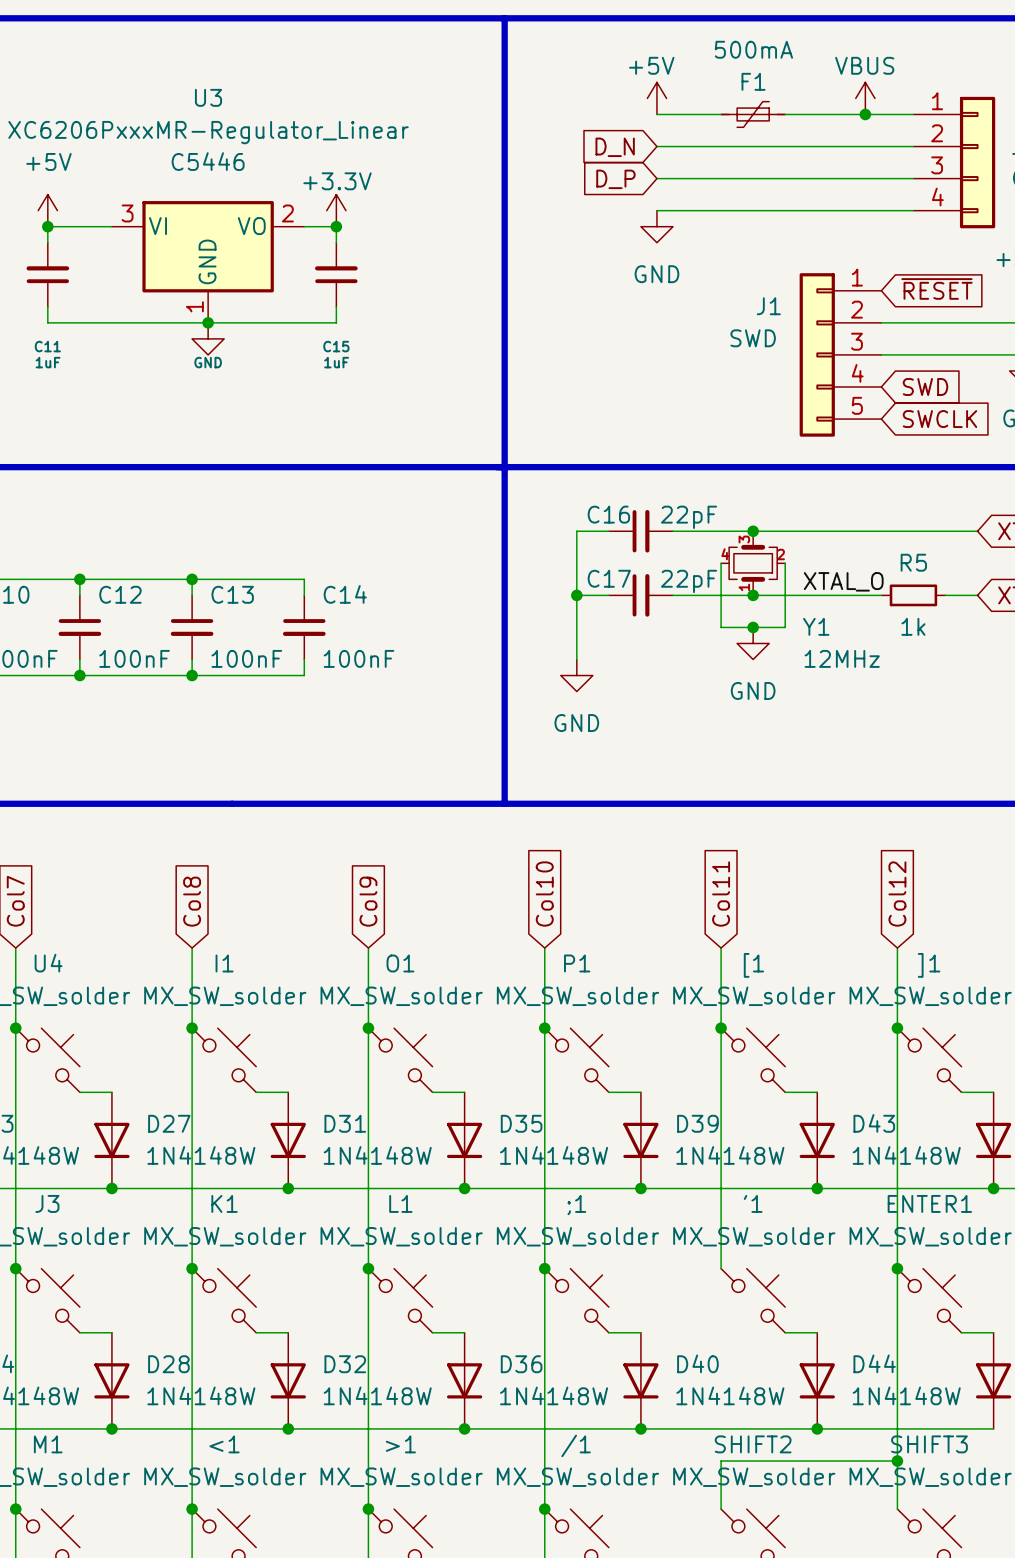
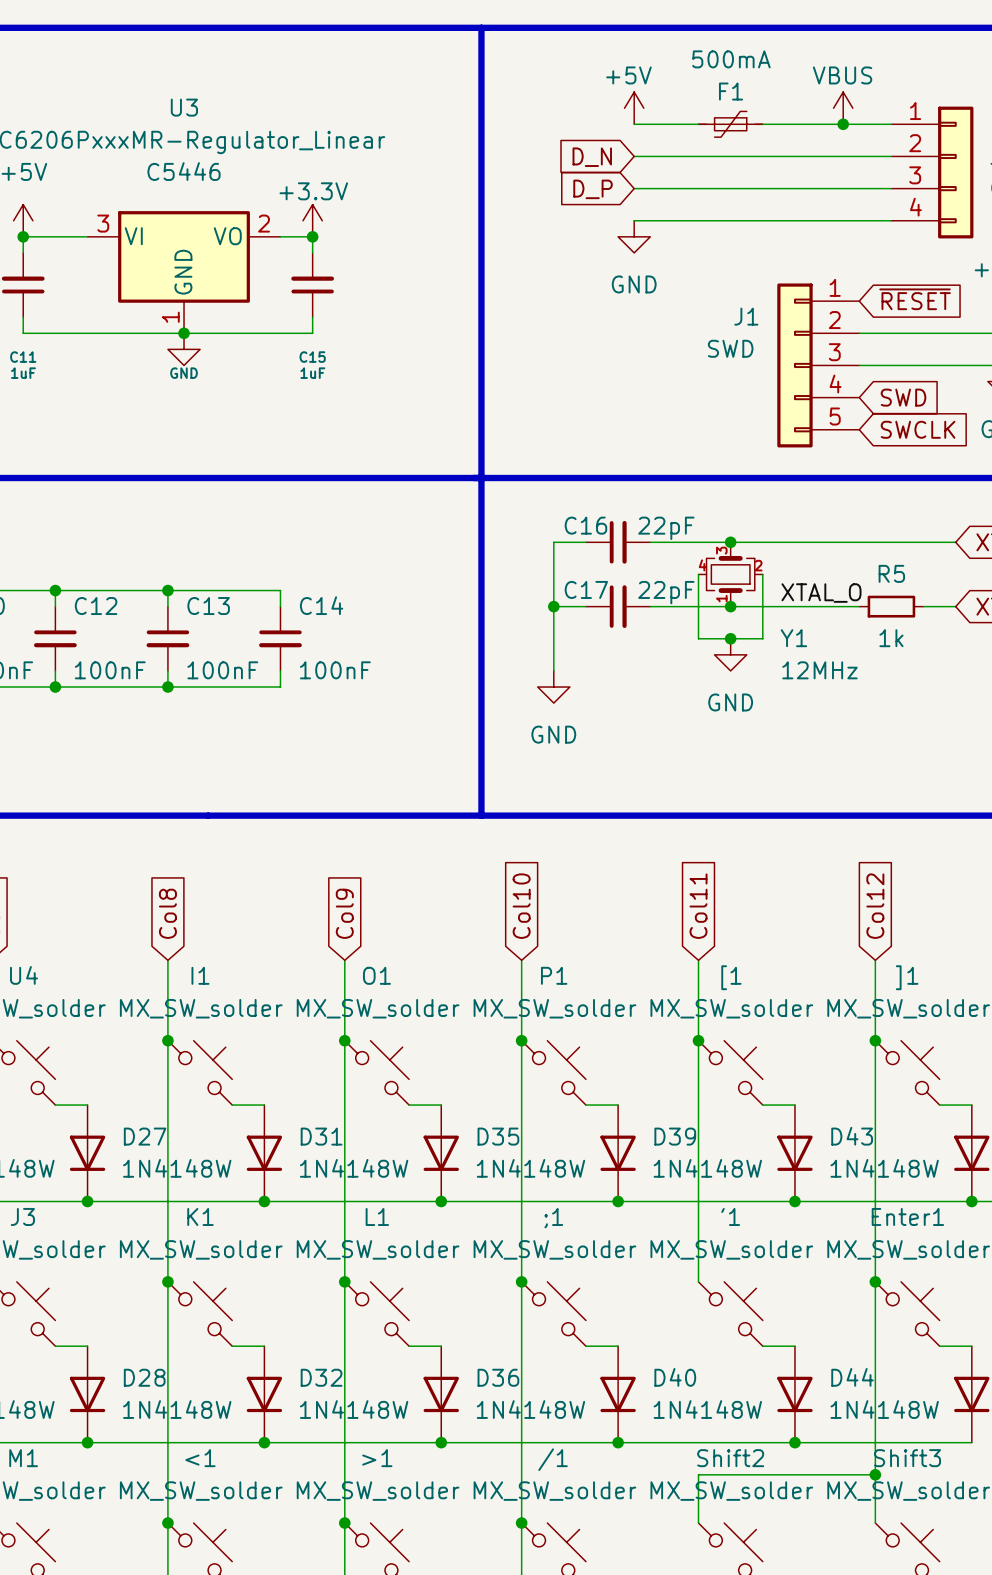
ENTER1 name: ENTER1 (929, 1203) -> Enter1 (907, 1216)
SHIFT2 name: SHIFT2 (753, 1444) -> Shift2 (730, 1458)
SHIFT3 name: SHIFT3 (929, 1444) -> Shift3 (907, 1458)

